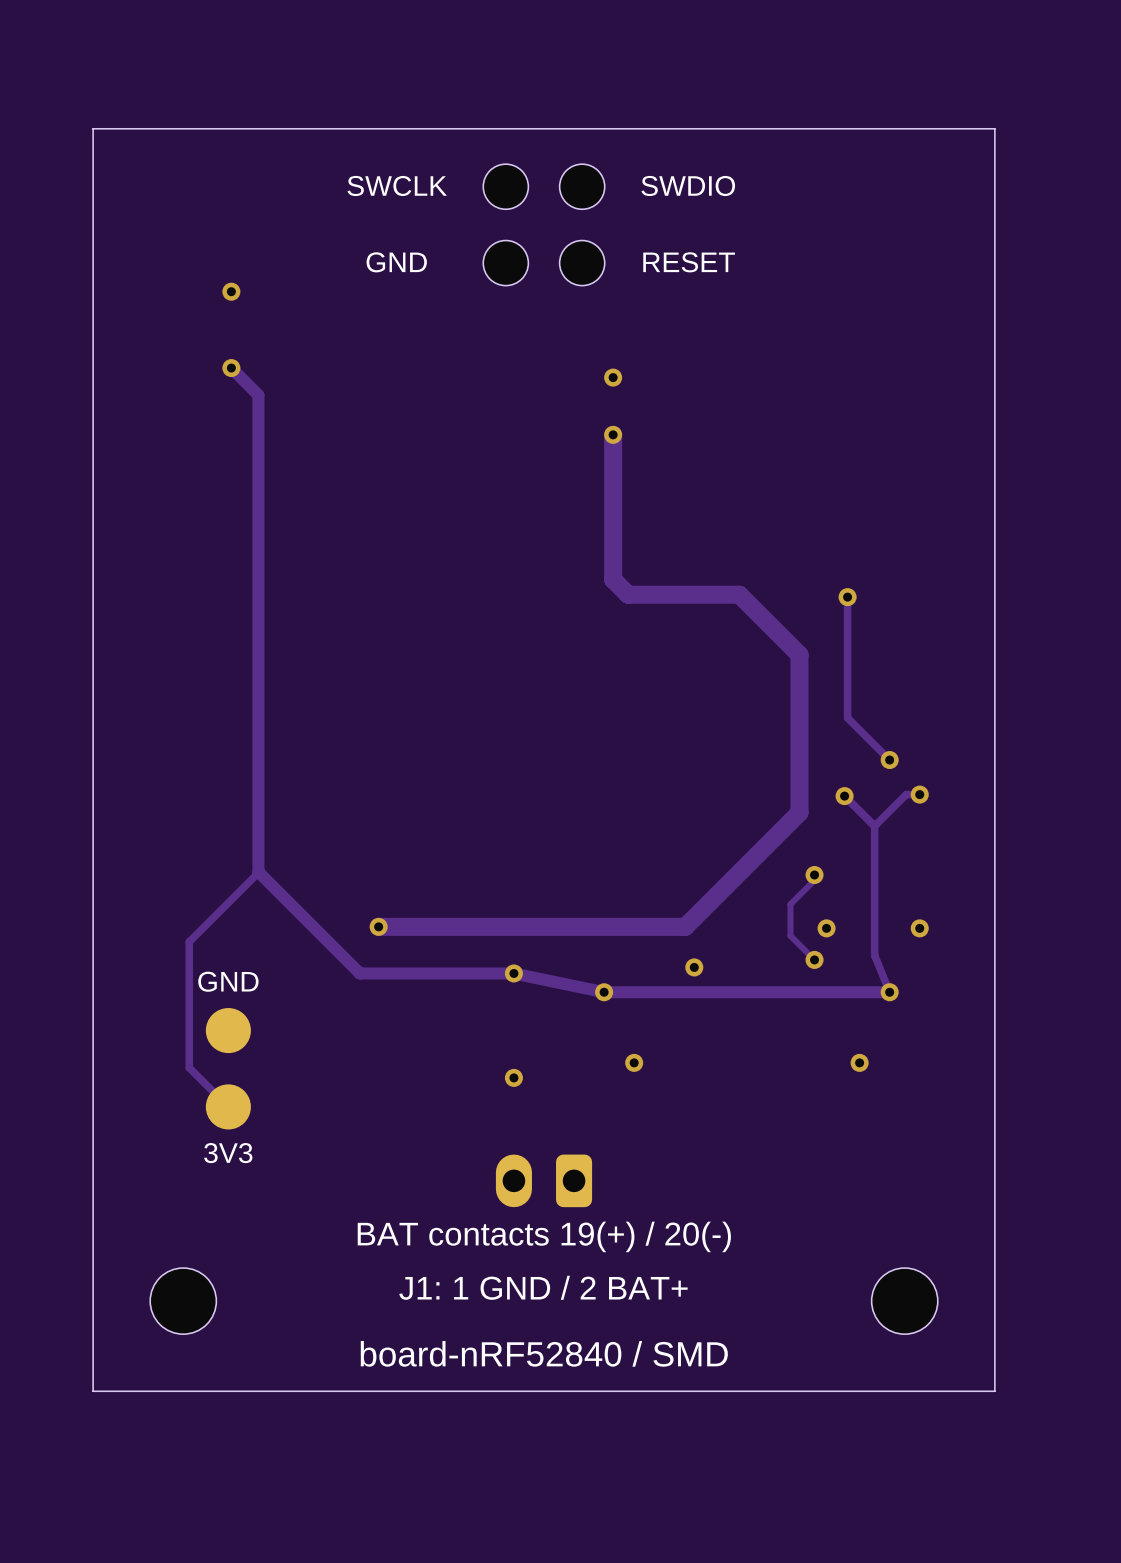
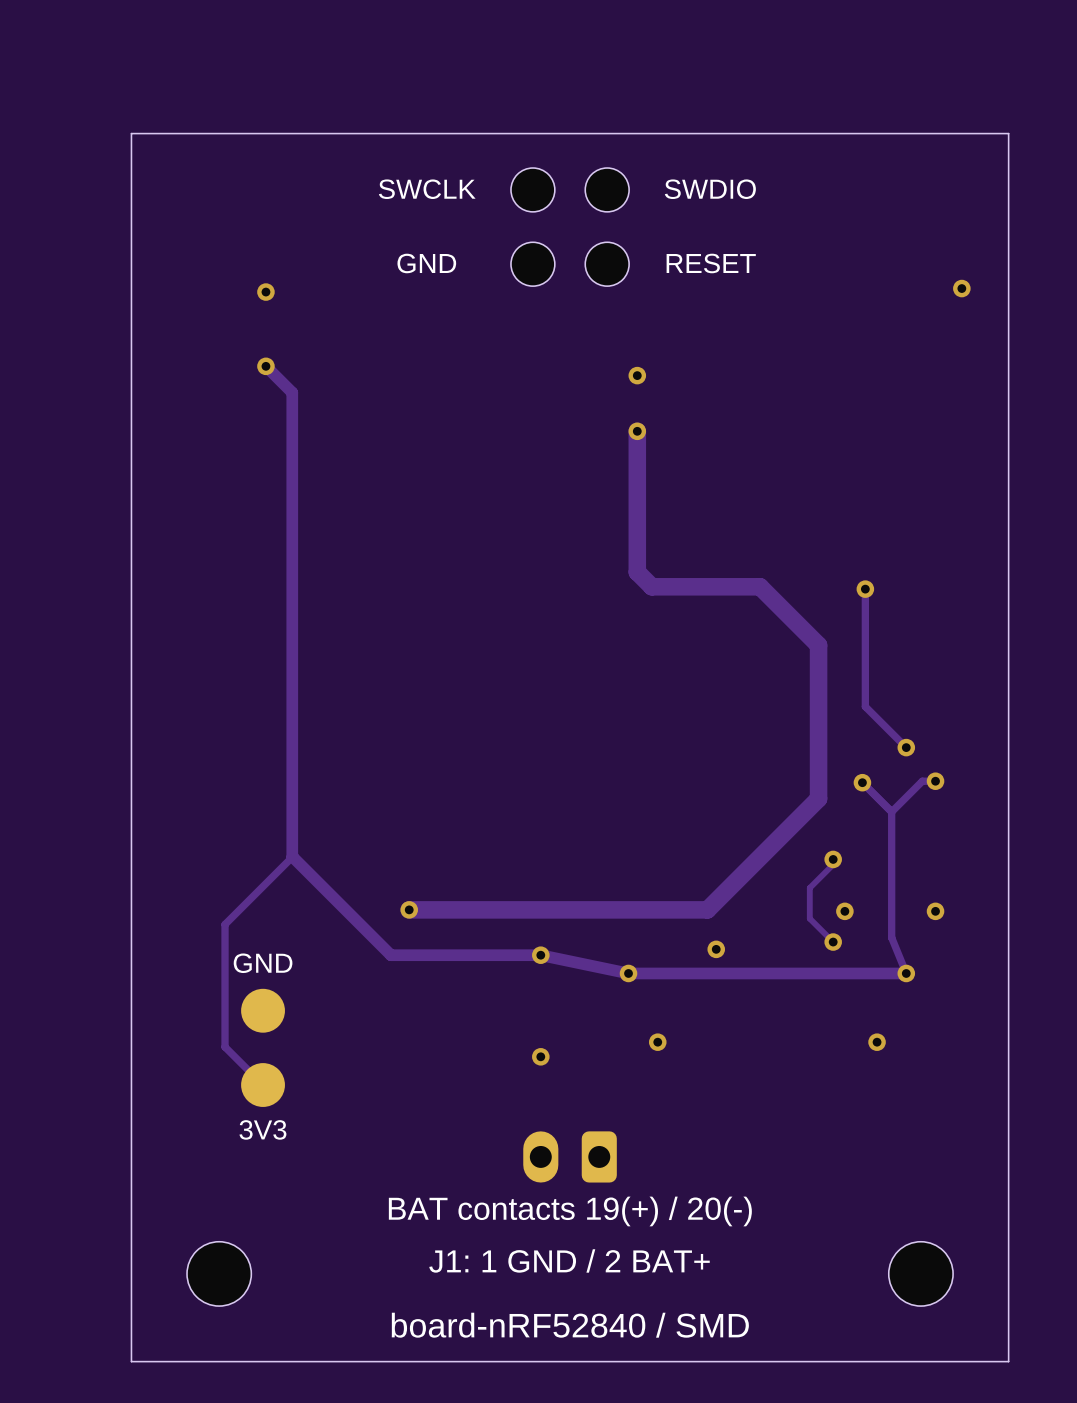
via: none -> (961, 288)

